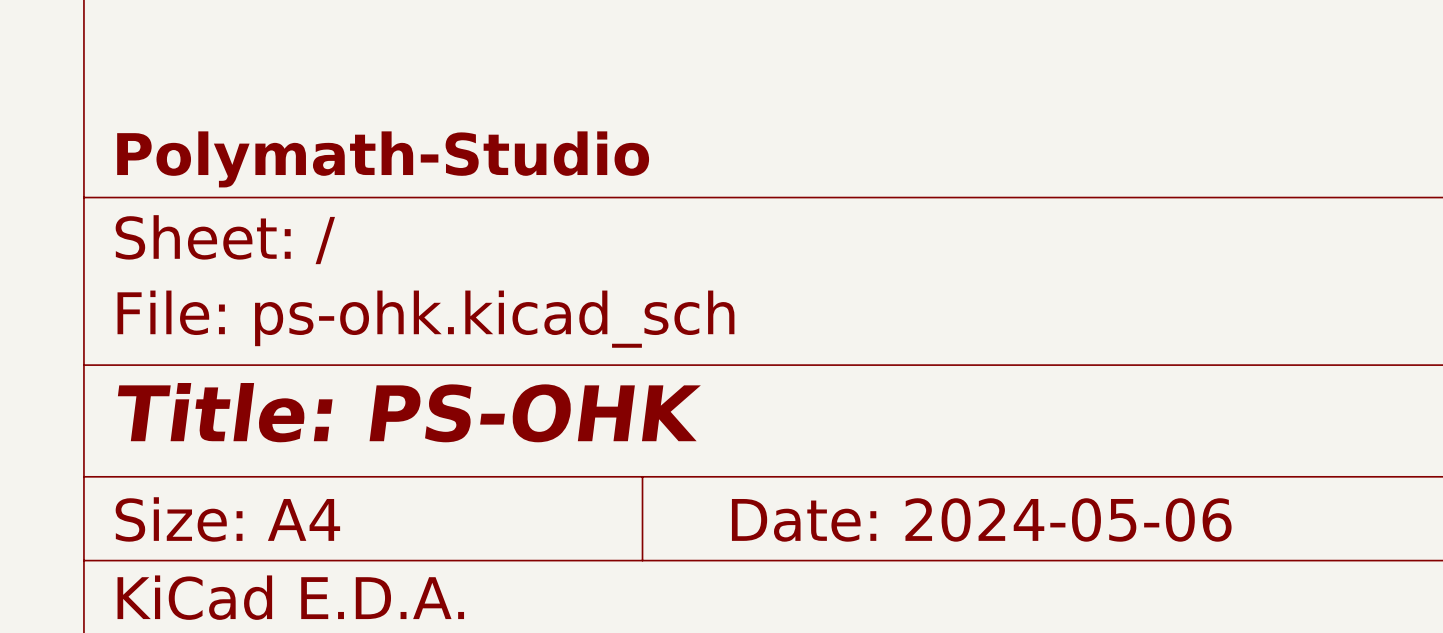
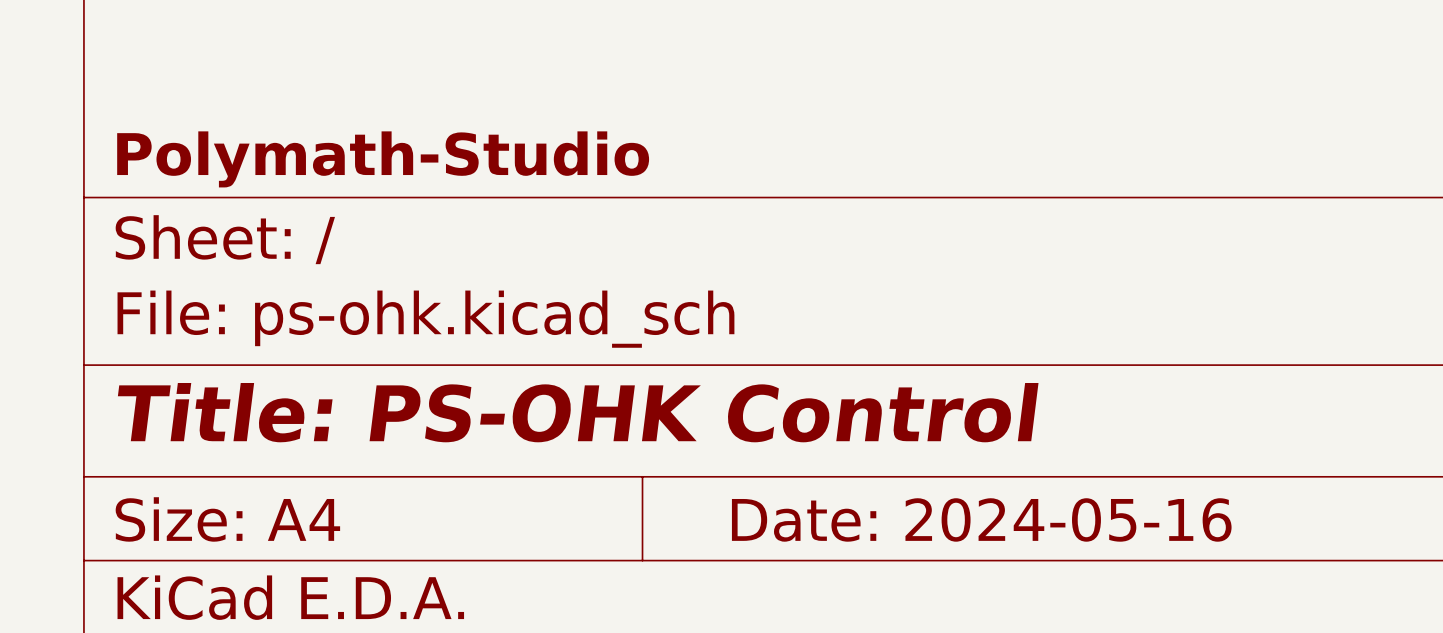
title block: Title: PS-OHK (409, 412) -> Title: PS-OHK Control (578, 412)
title block: Date: 2024-05-06 (981, 519) -> Date: 2024-05-16 (981, 519)

